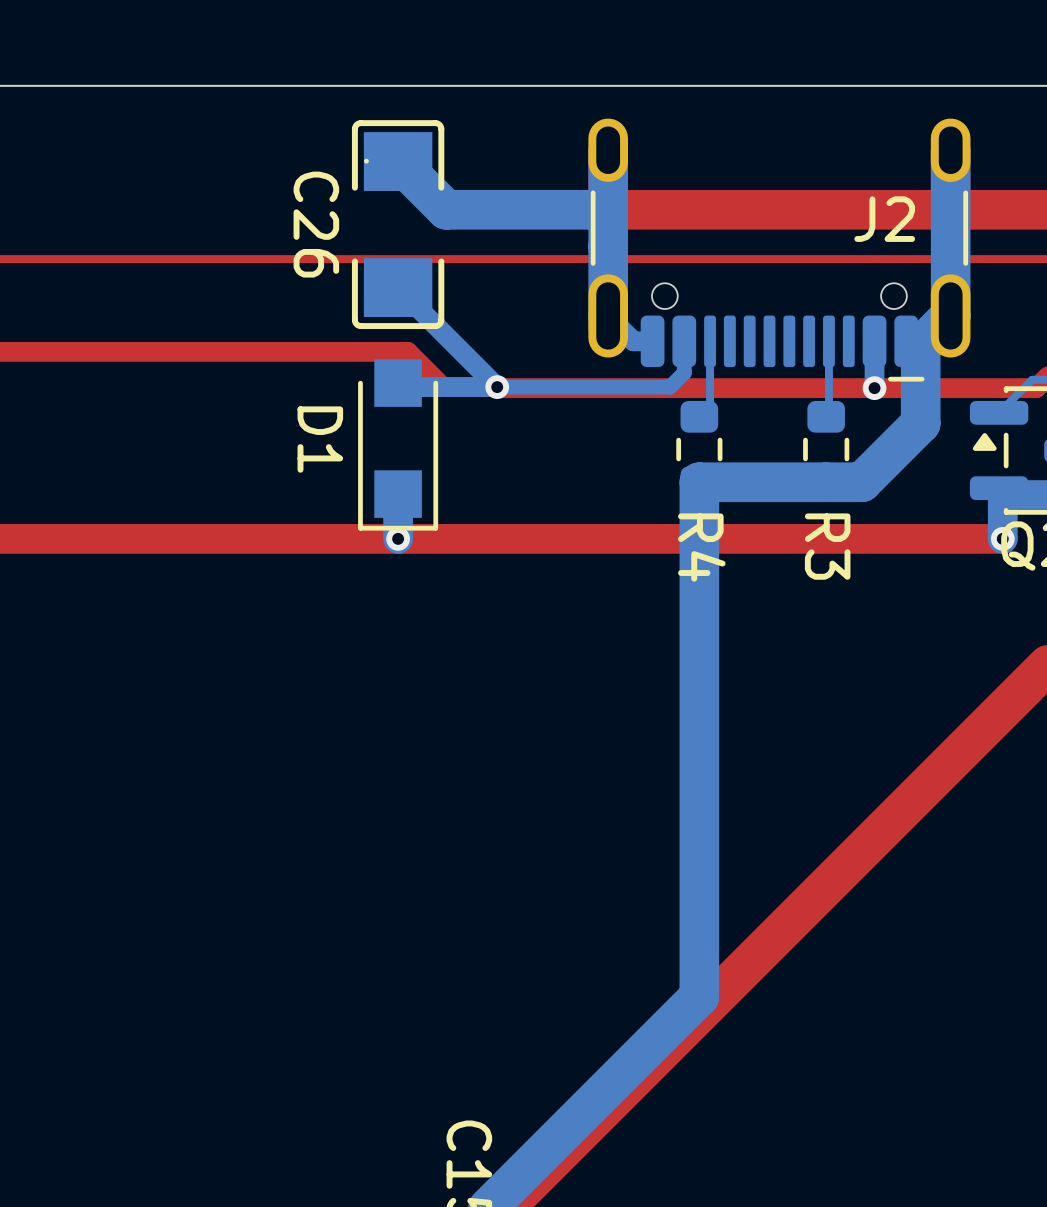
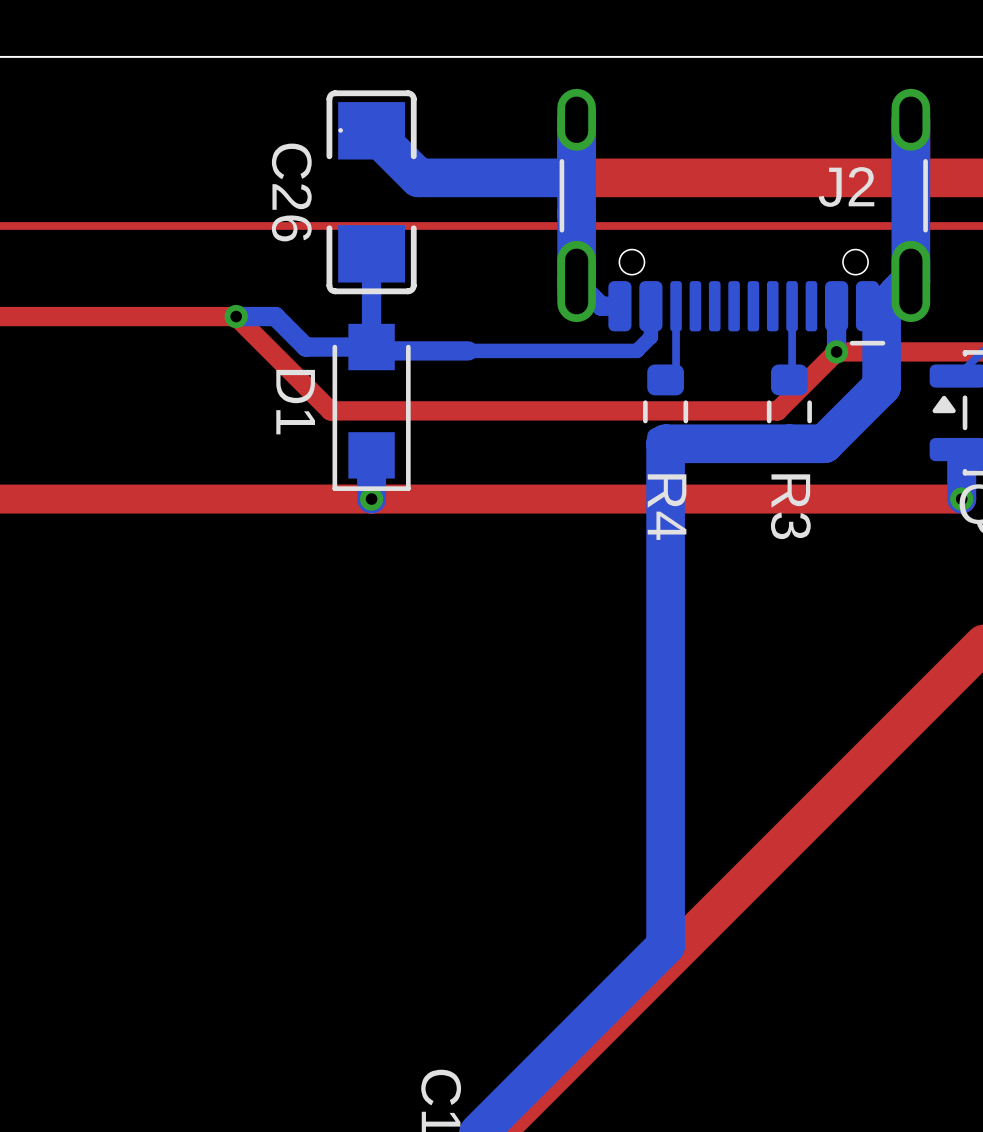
bottom track: (398, 288) (497, 387) -> (371, 254) (371, 347) (305, 347) (275, 316) (236, 316)
top track: (259, 351) (407, 351) (442, 387) (874, 388) -> (236, 316) (330, 410) (777, 410) (836, 351)
via: none -> (236, 316)
via: (497, 387) -> none

